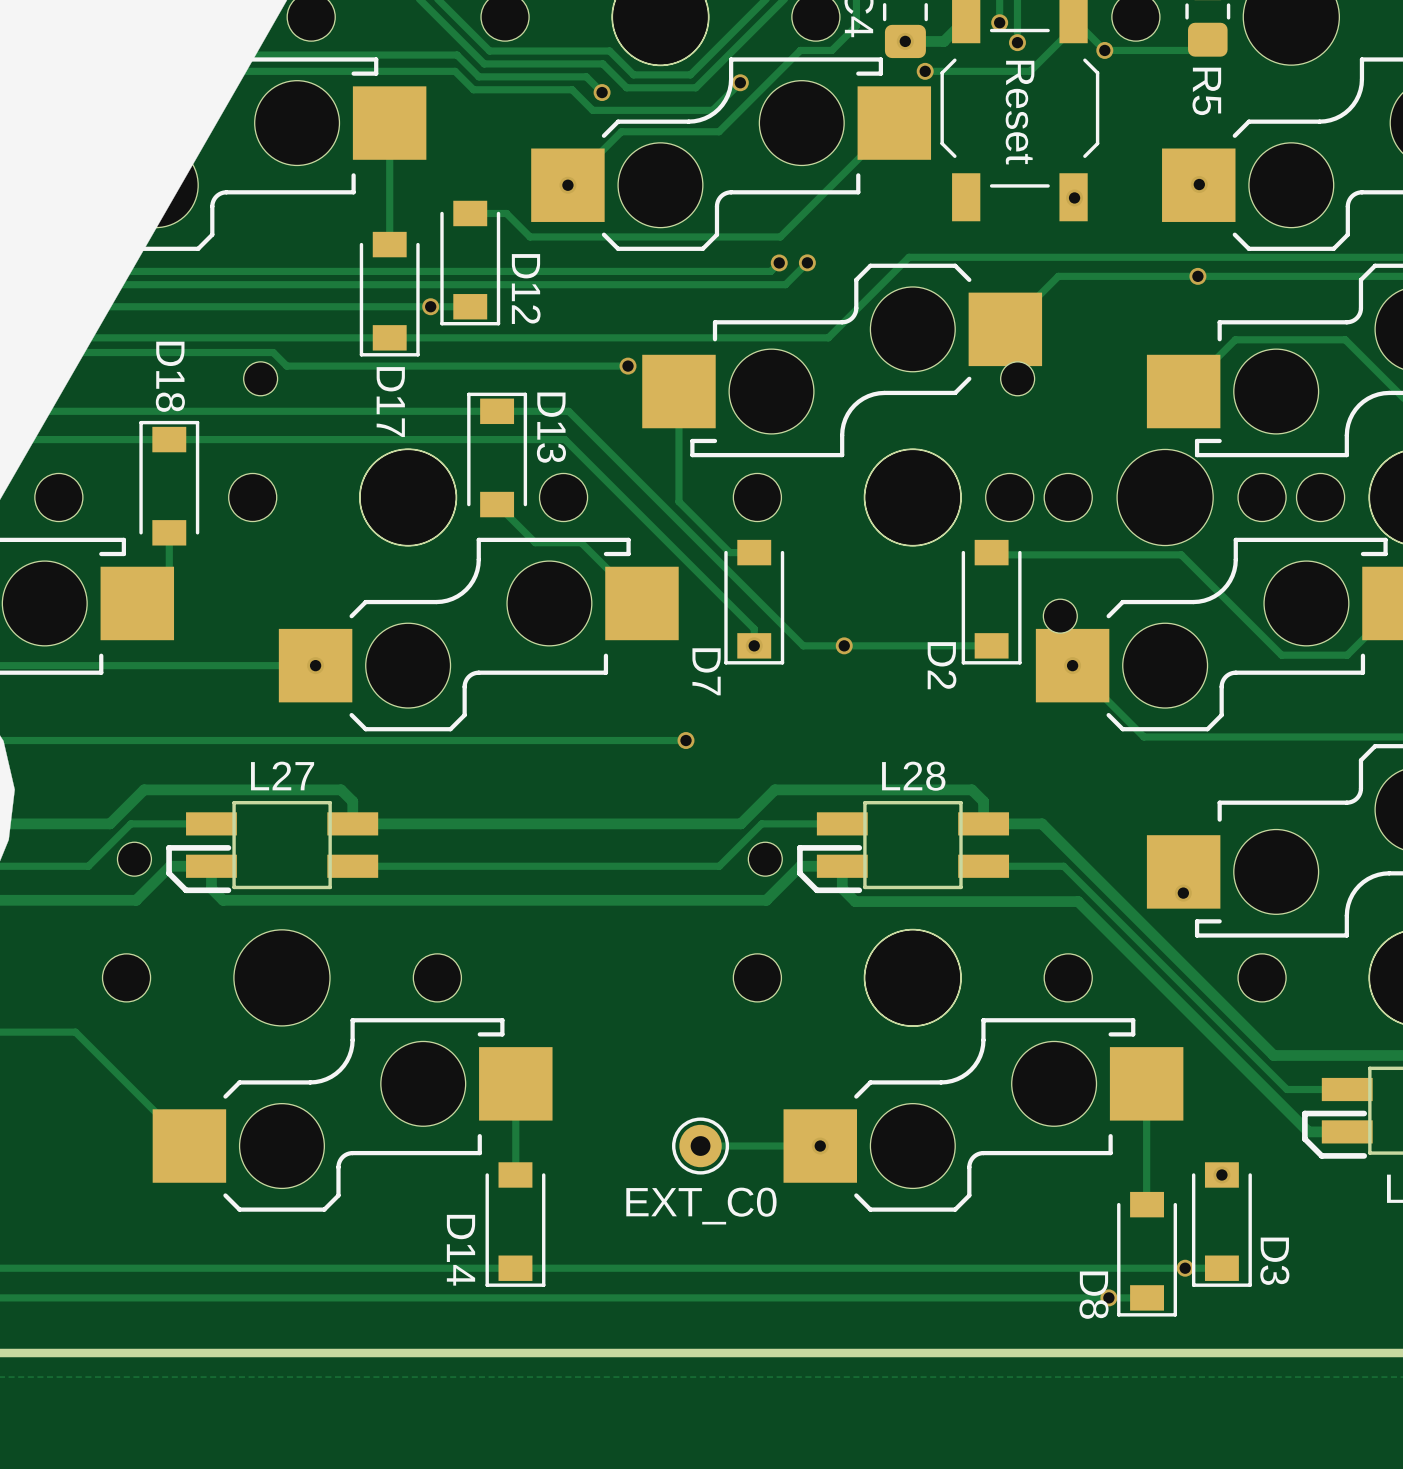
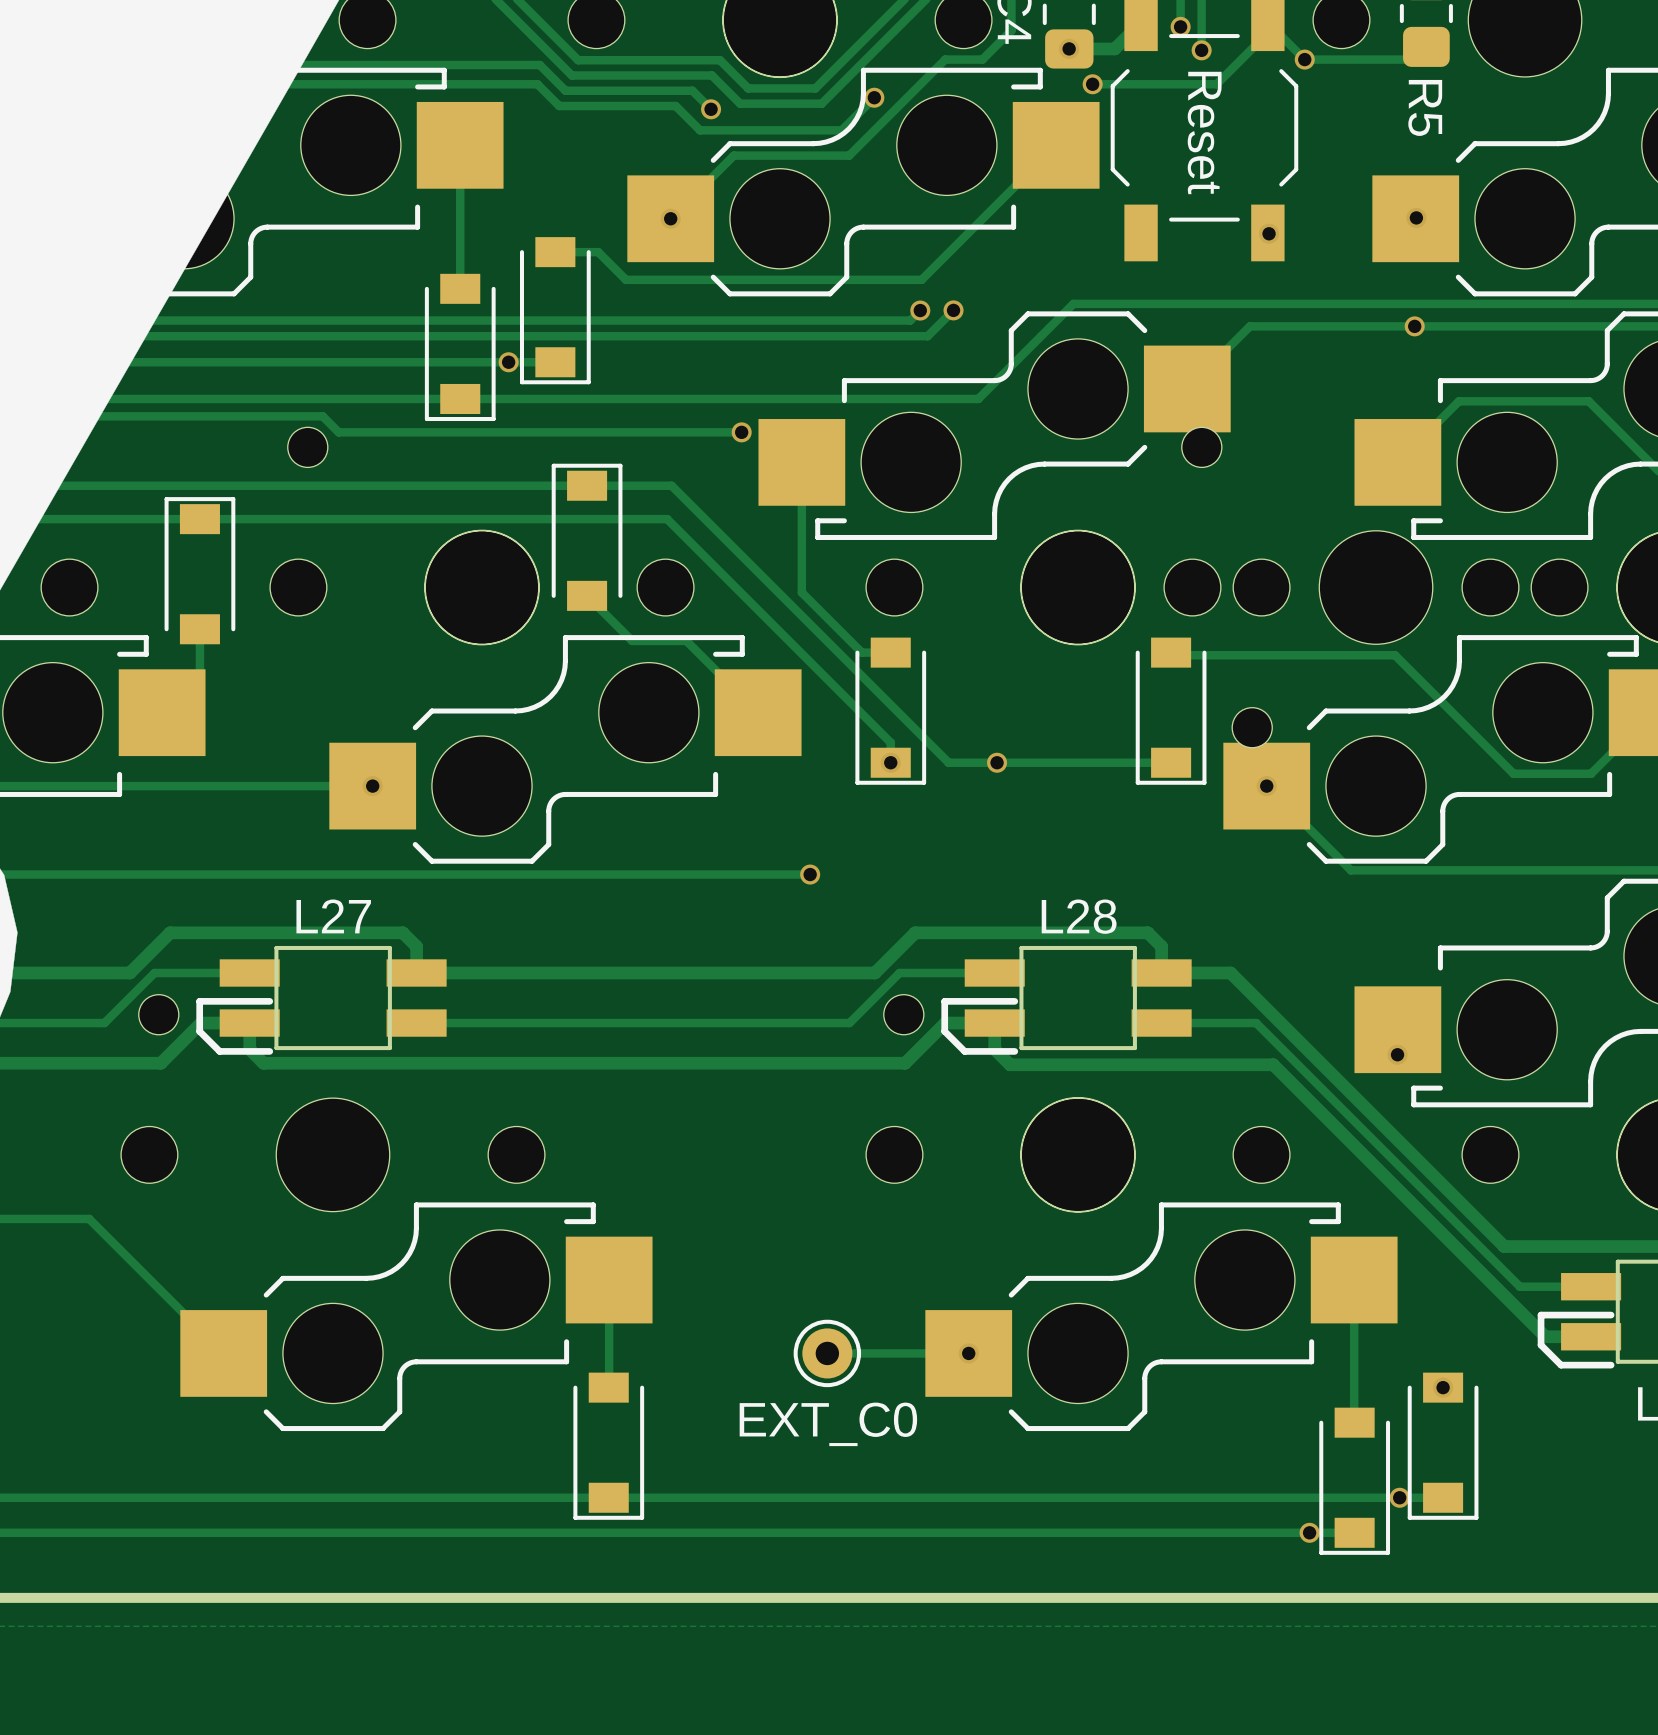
D12 name: D12 (526, 289) -> none
D18 name: D18 (170, 376) -> none
D17 name: D17 (390, 402) -> none
D13 name: D13 (551, 427) -> none
D2 name: D2 (942, 665) -> none
D7 name: D7 (706, 671) -> none
D14 name: D14 (460, 1250) -> none
D3 name: D3 (1274, 1261) -> none
D8 name: D8 (1093, 1295) -> none

